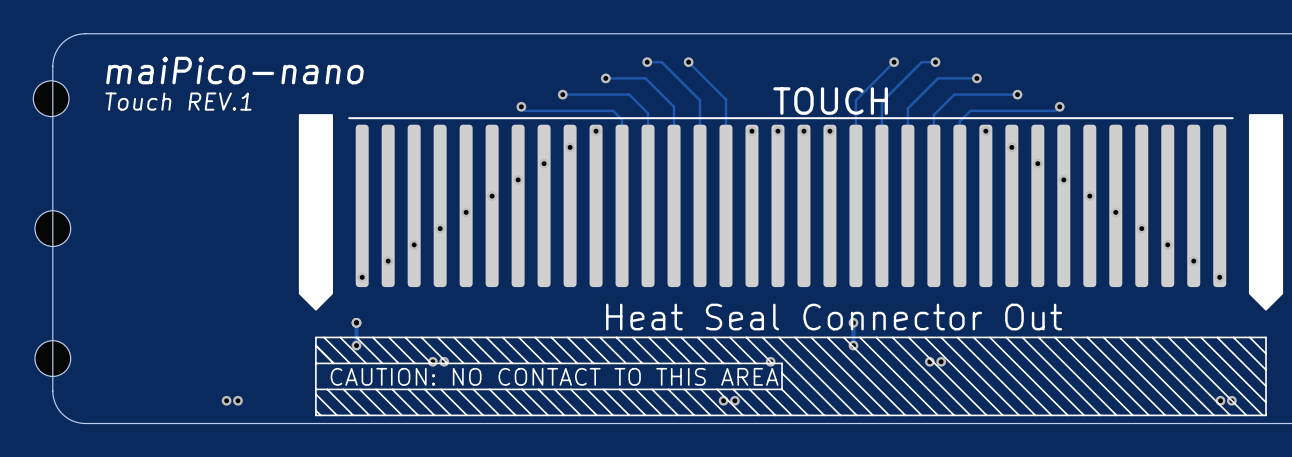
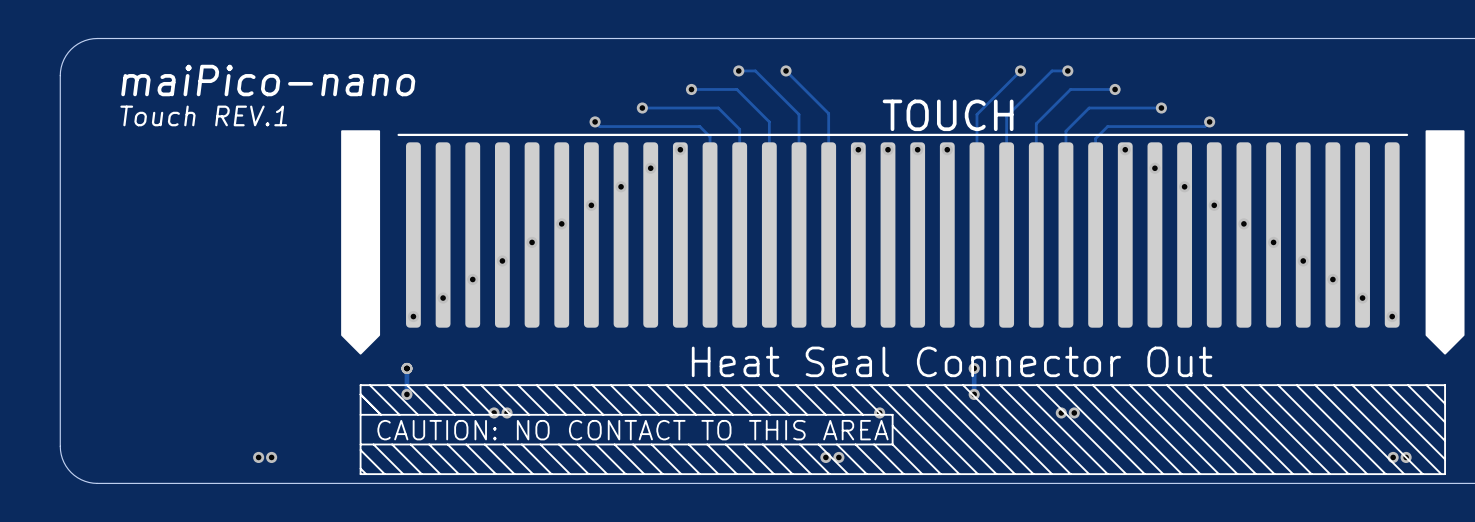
part: (51, 98) -> none
part: (52, 228) -> none
part: (52, 358) -> none

